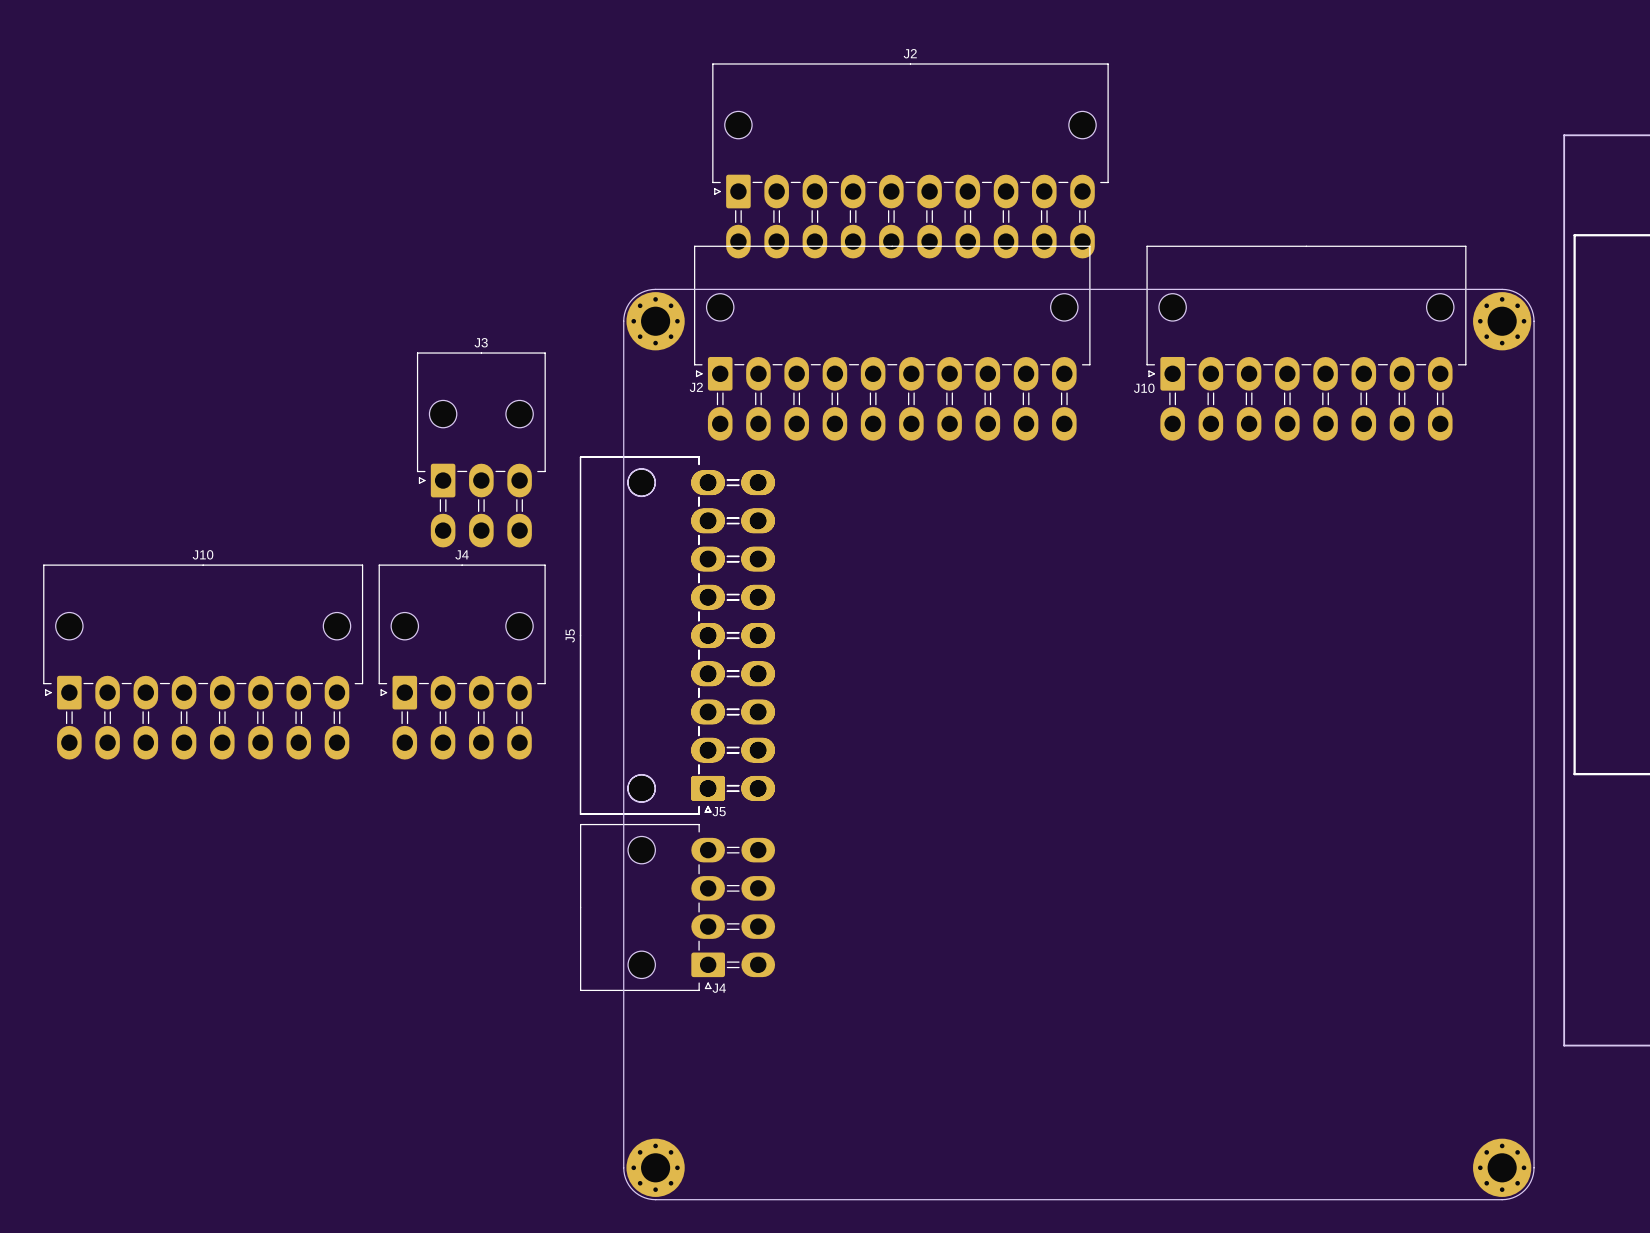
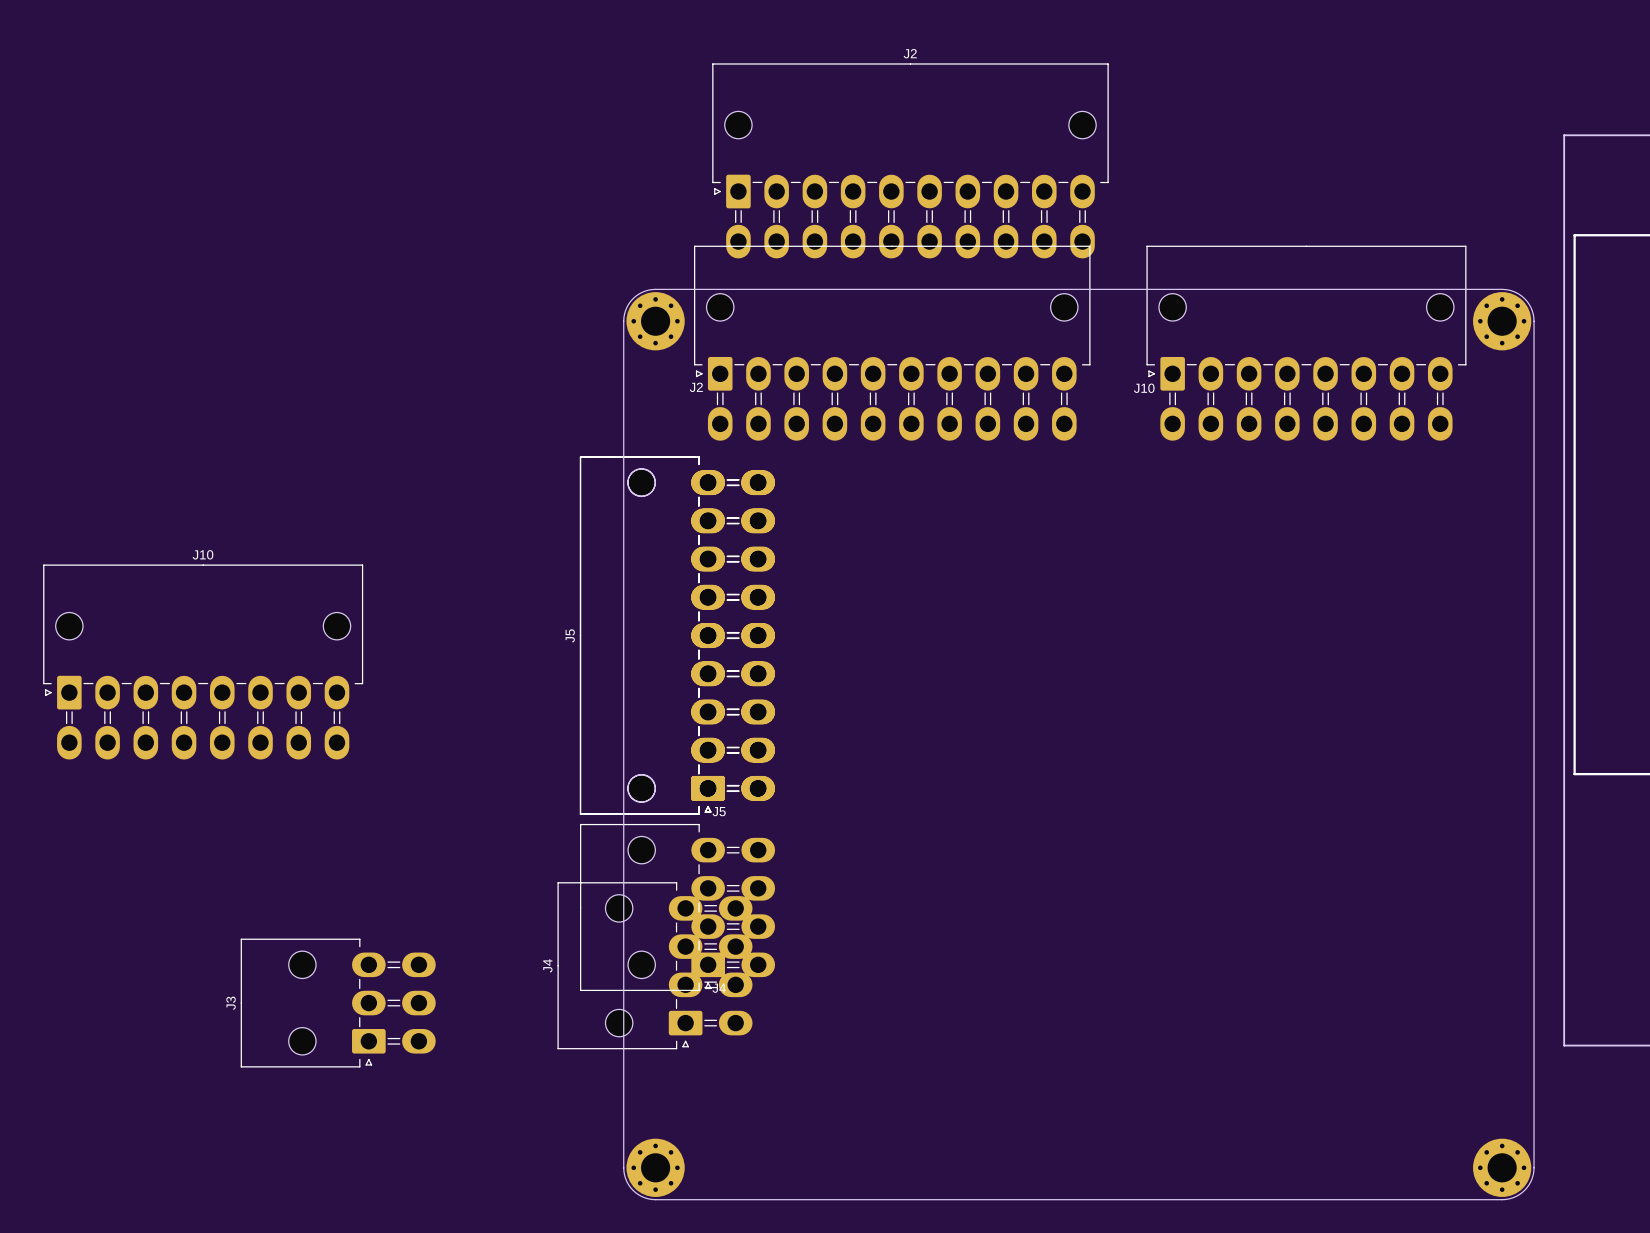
J3 rotation: 0° (481, 449) -> 90° counterclockwise (338, 1003)
J3 position: (481, 449) -> (338, 1003)
J4: (462, 662) -> none
J4: none -> (655, 965)

